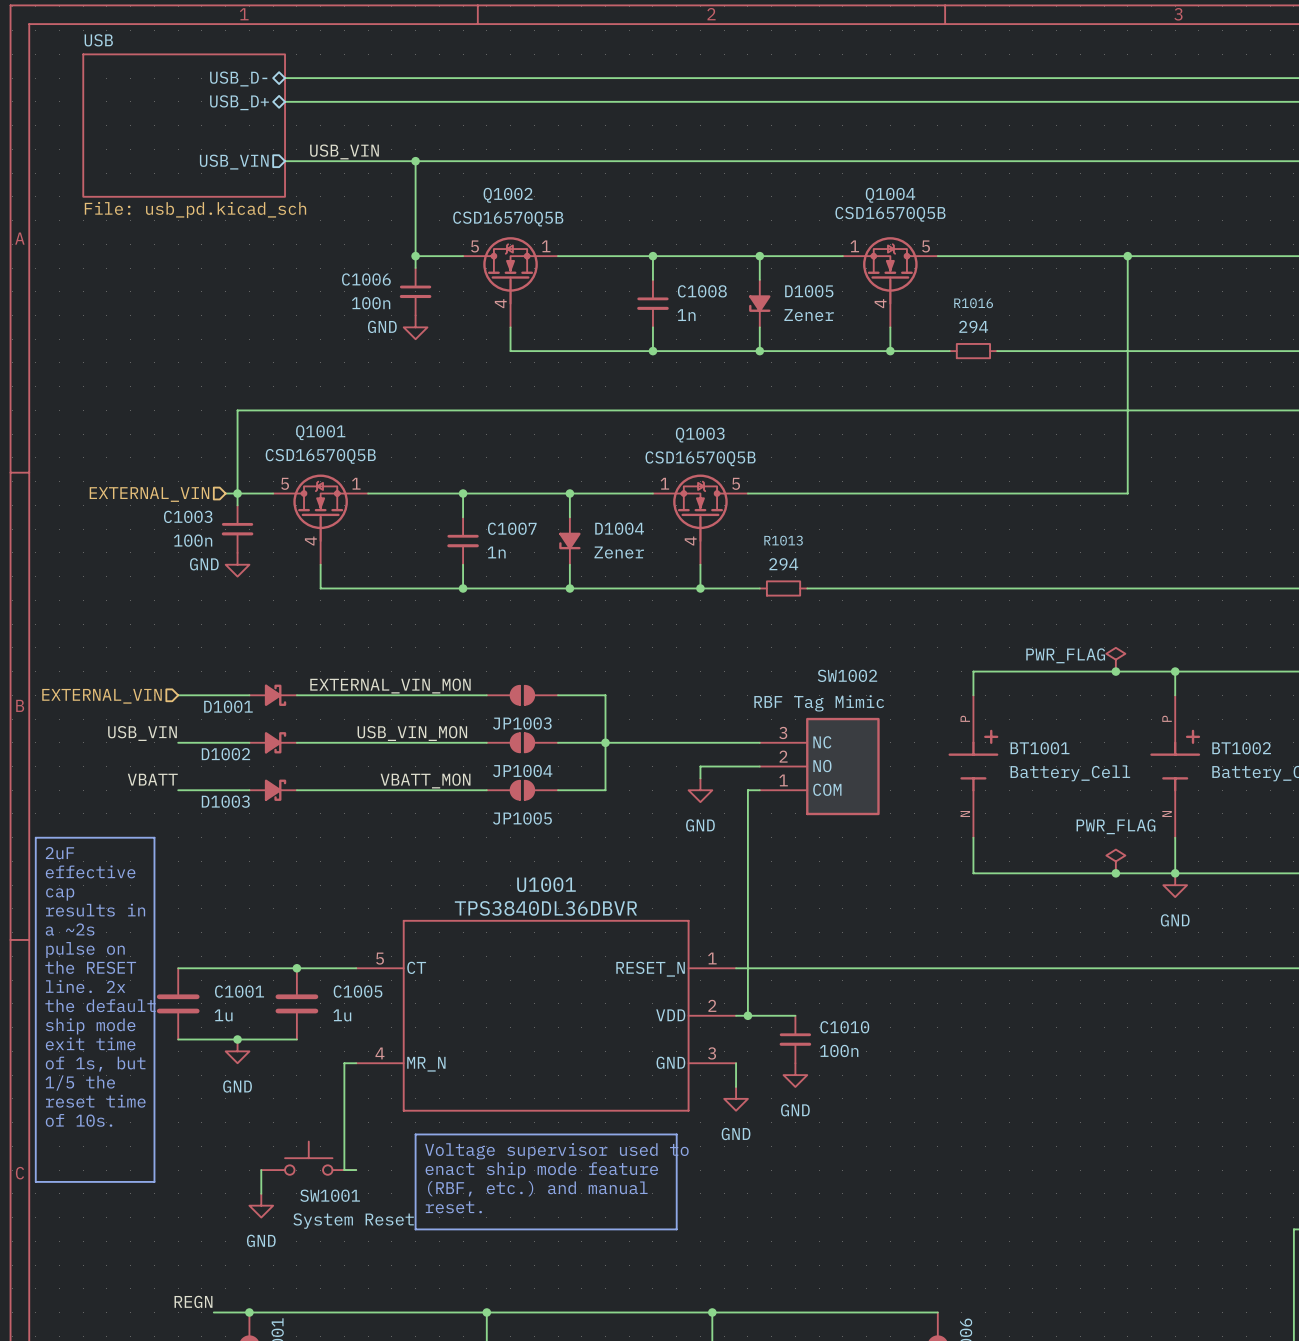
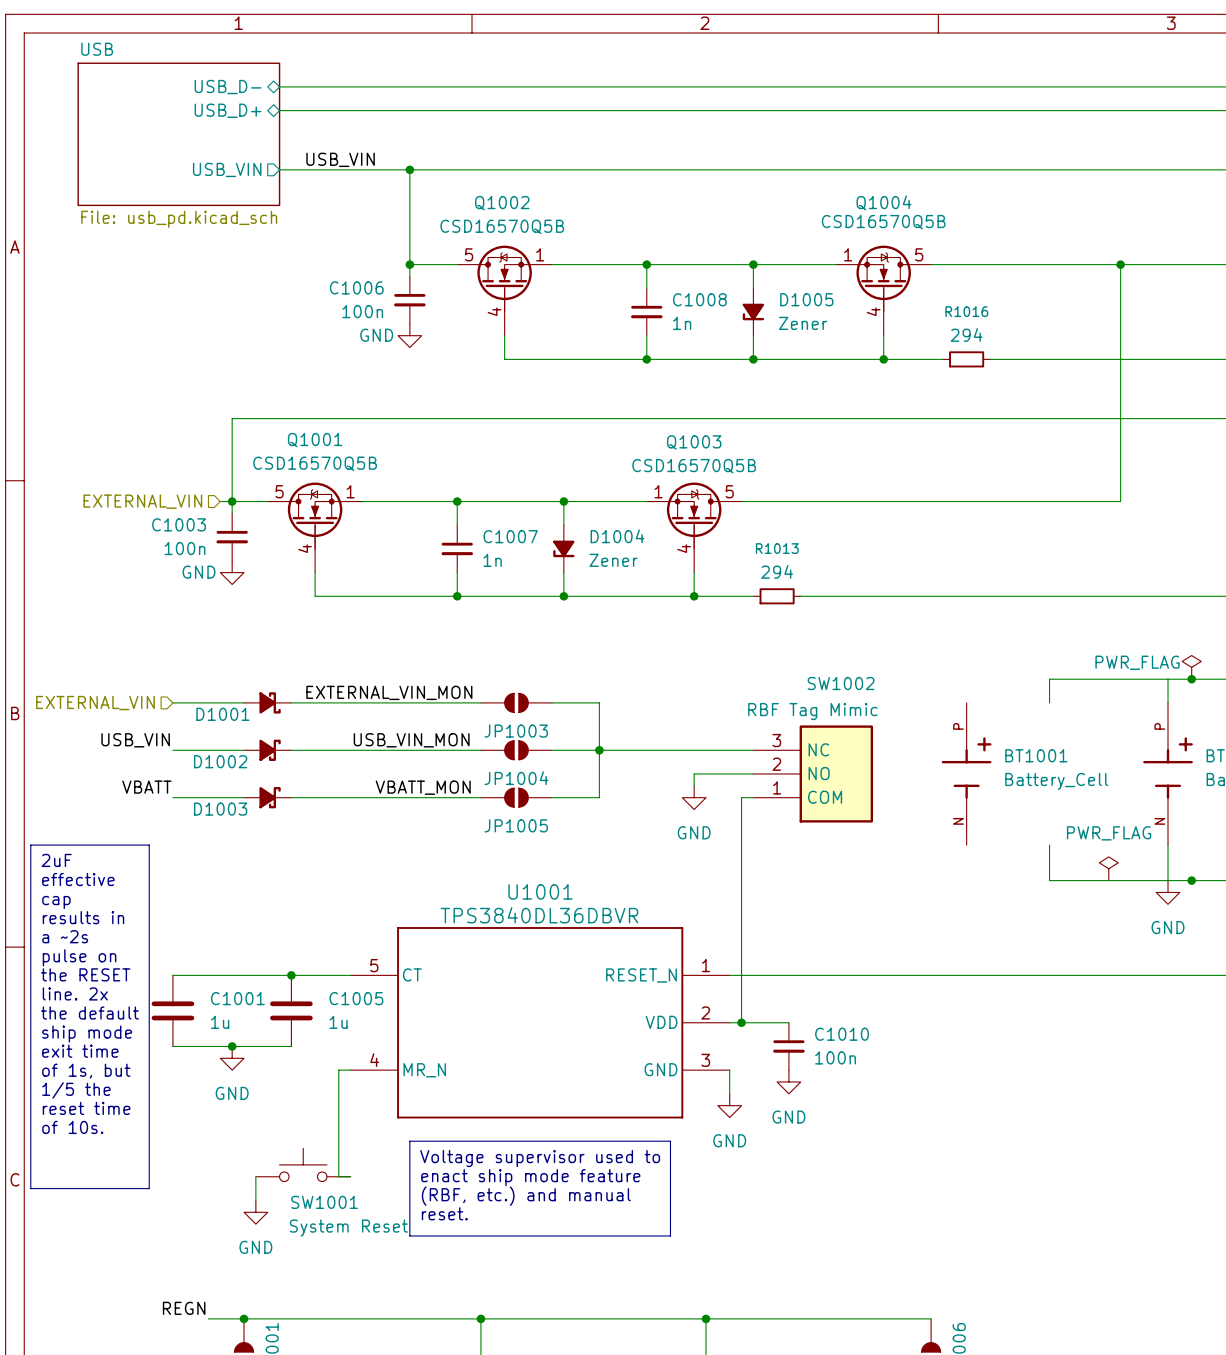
power symbol position: PWR_FLAG (1115, 659) -> PWR_FLAG (1191, 667)
wire: (1056, 671) (973, 671) (973, 695) -> (1049, 679) (1049, 702)
junction: (1115, 671) -> none
junction position: (1175, 671) -> (1191, 679)
wire: (973, 837) (973, 873) (1056, 873) -> (1049, 845) (1049, 880)
junction: (1115, 873) -> none
junction position: (1175, 873) -> (1191, 880)

